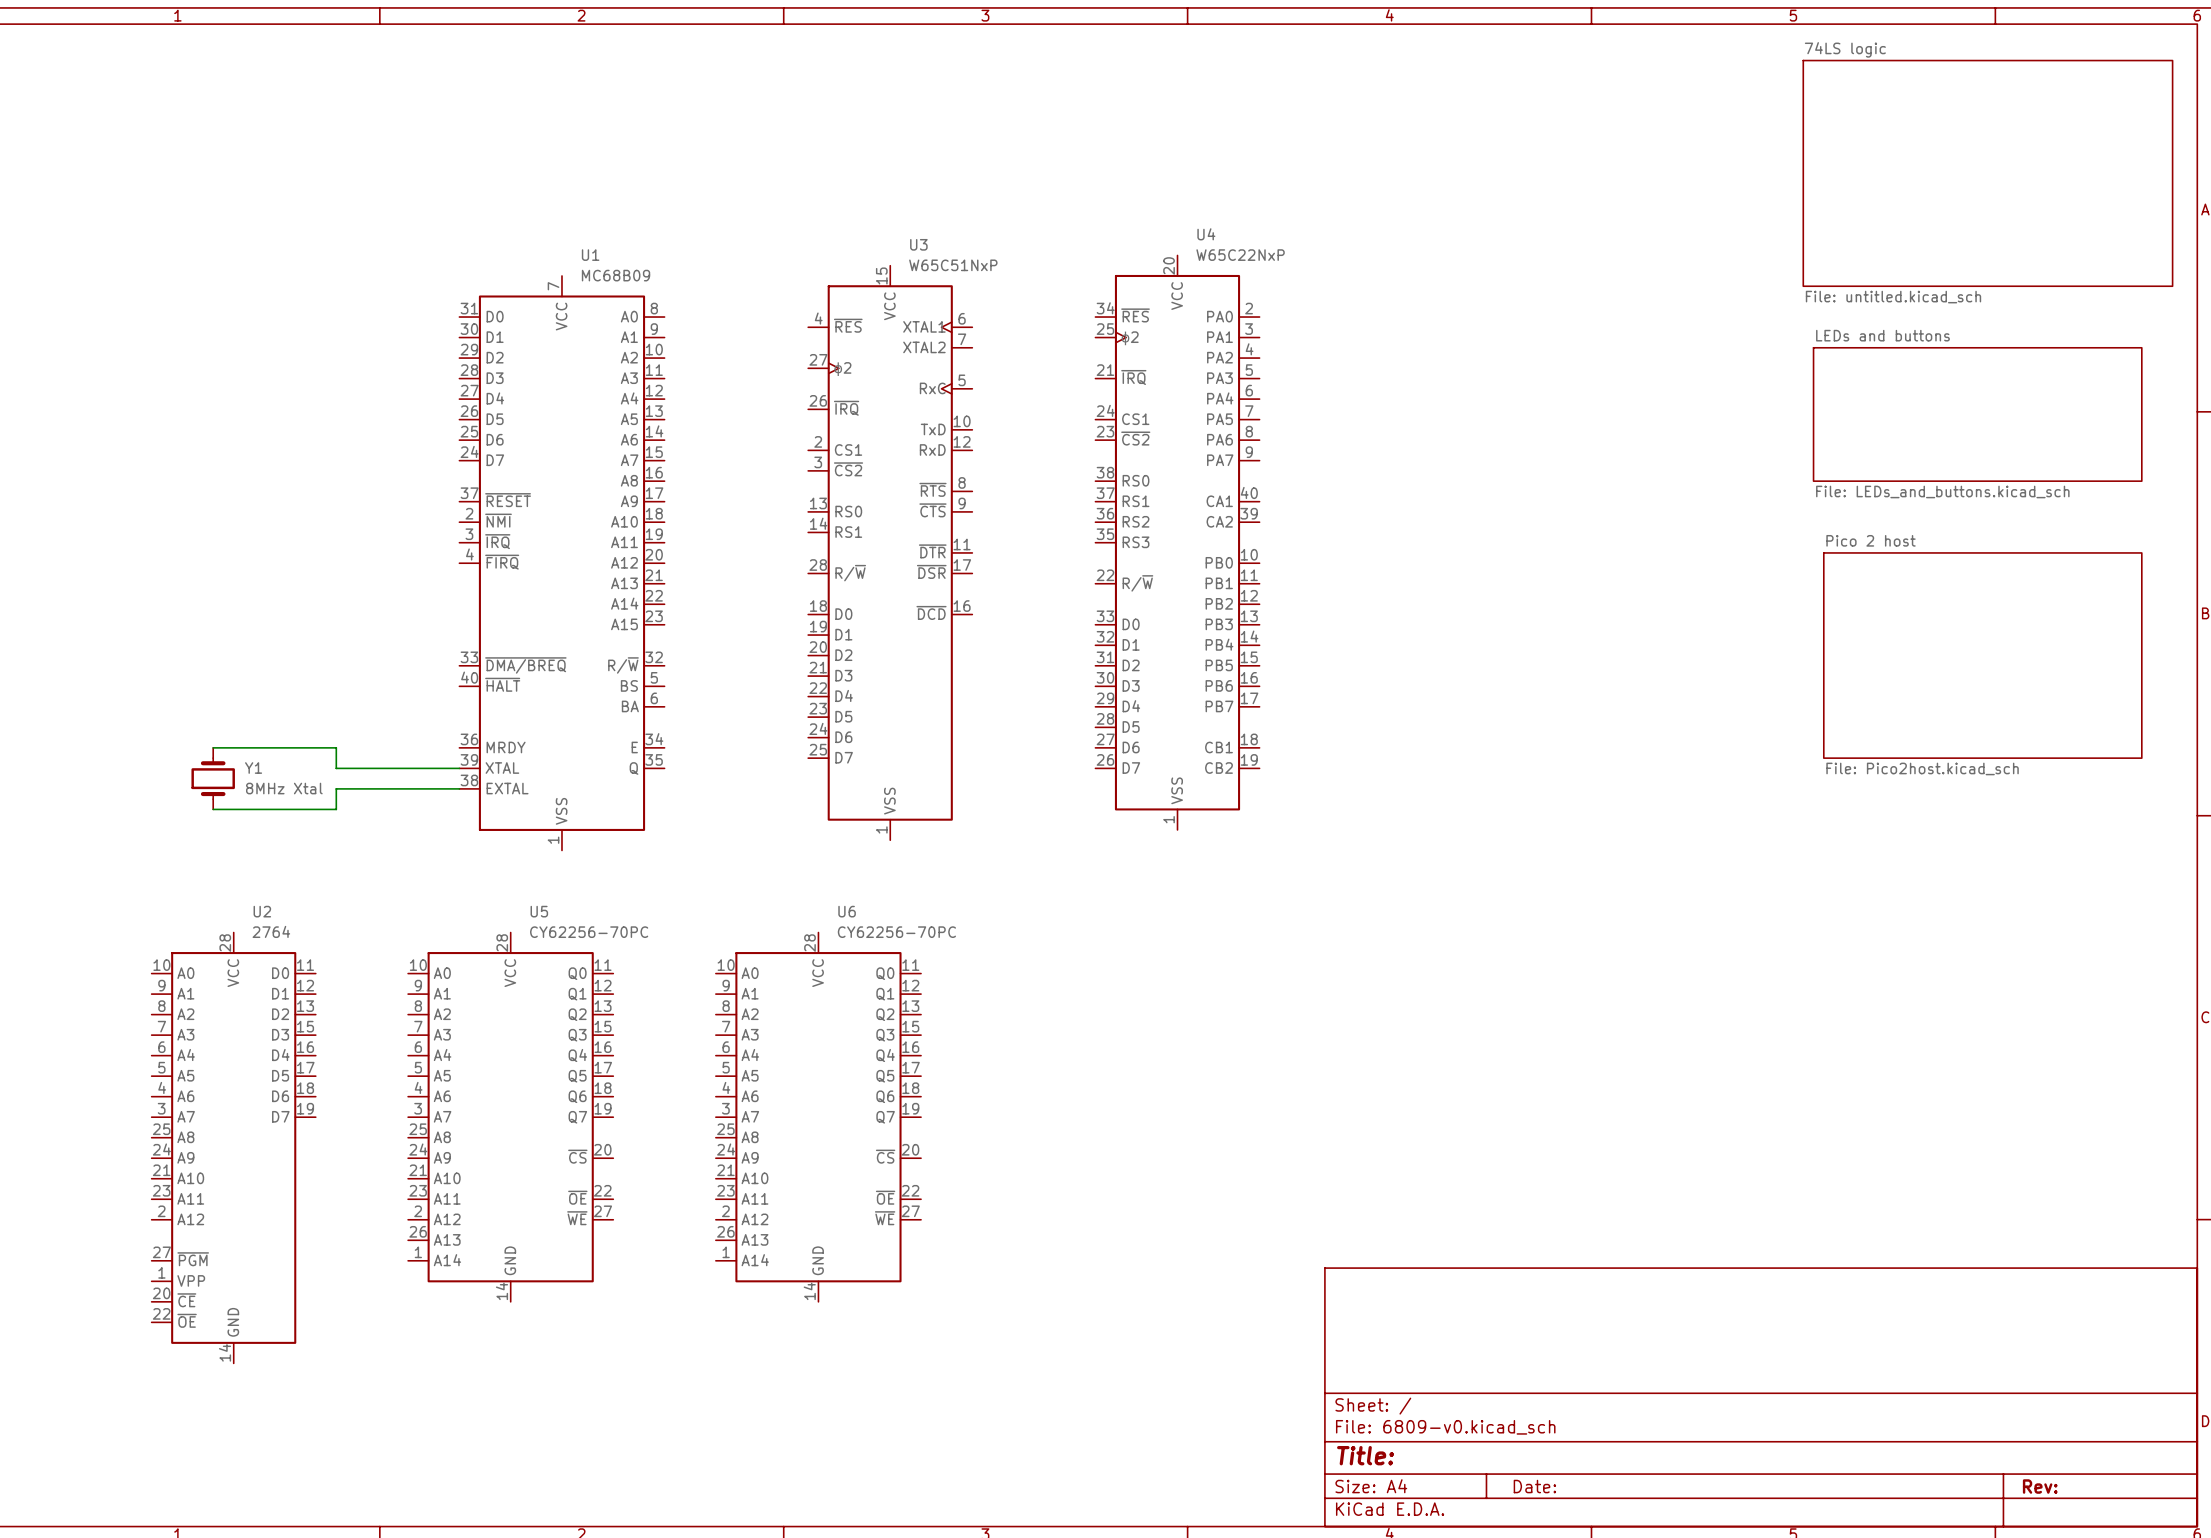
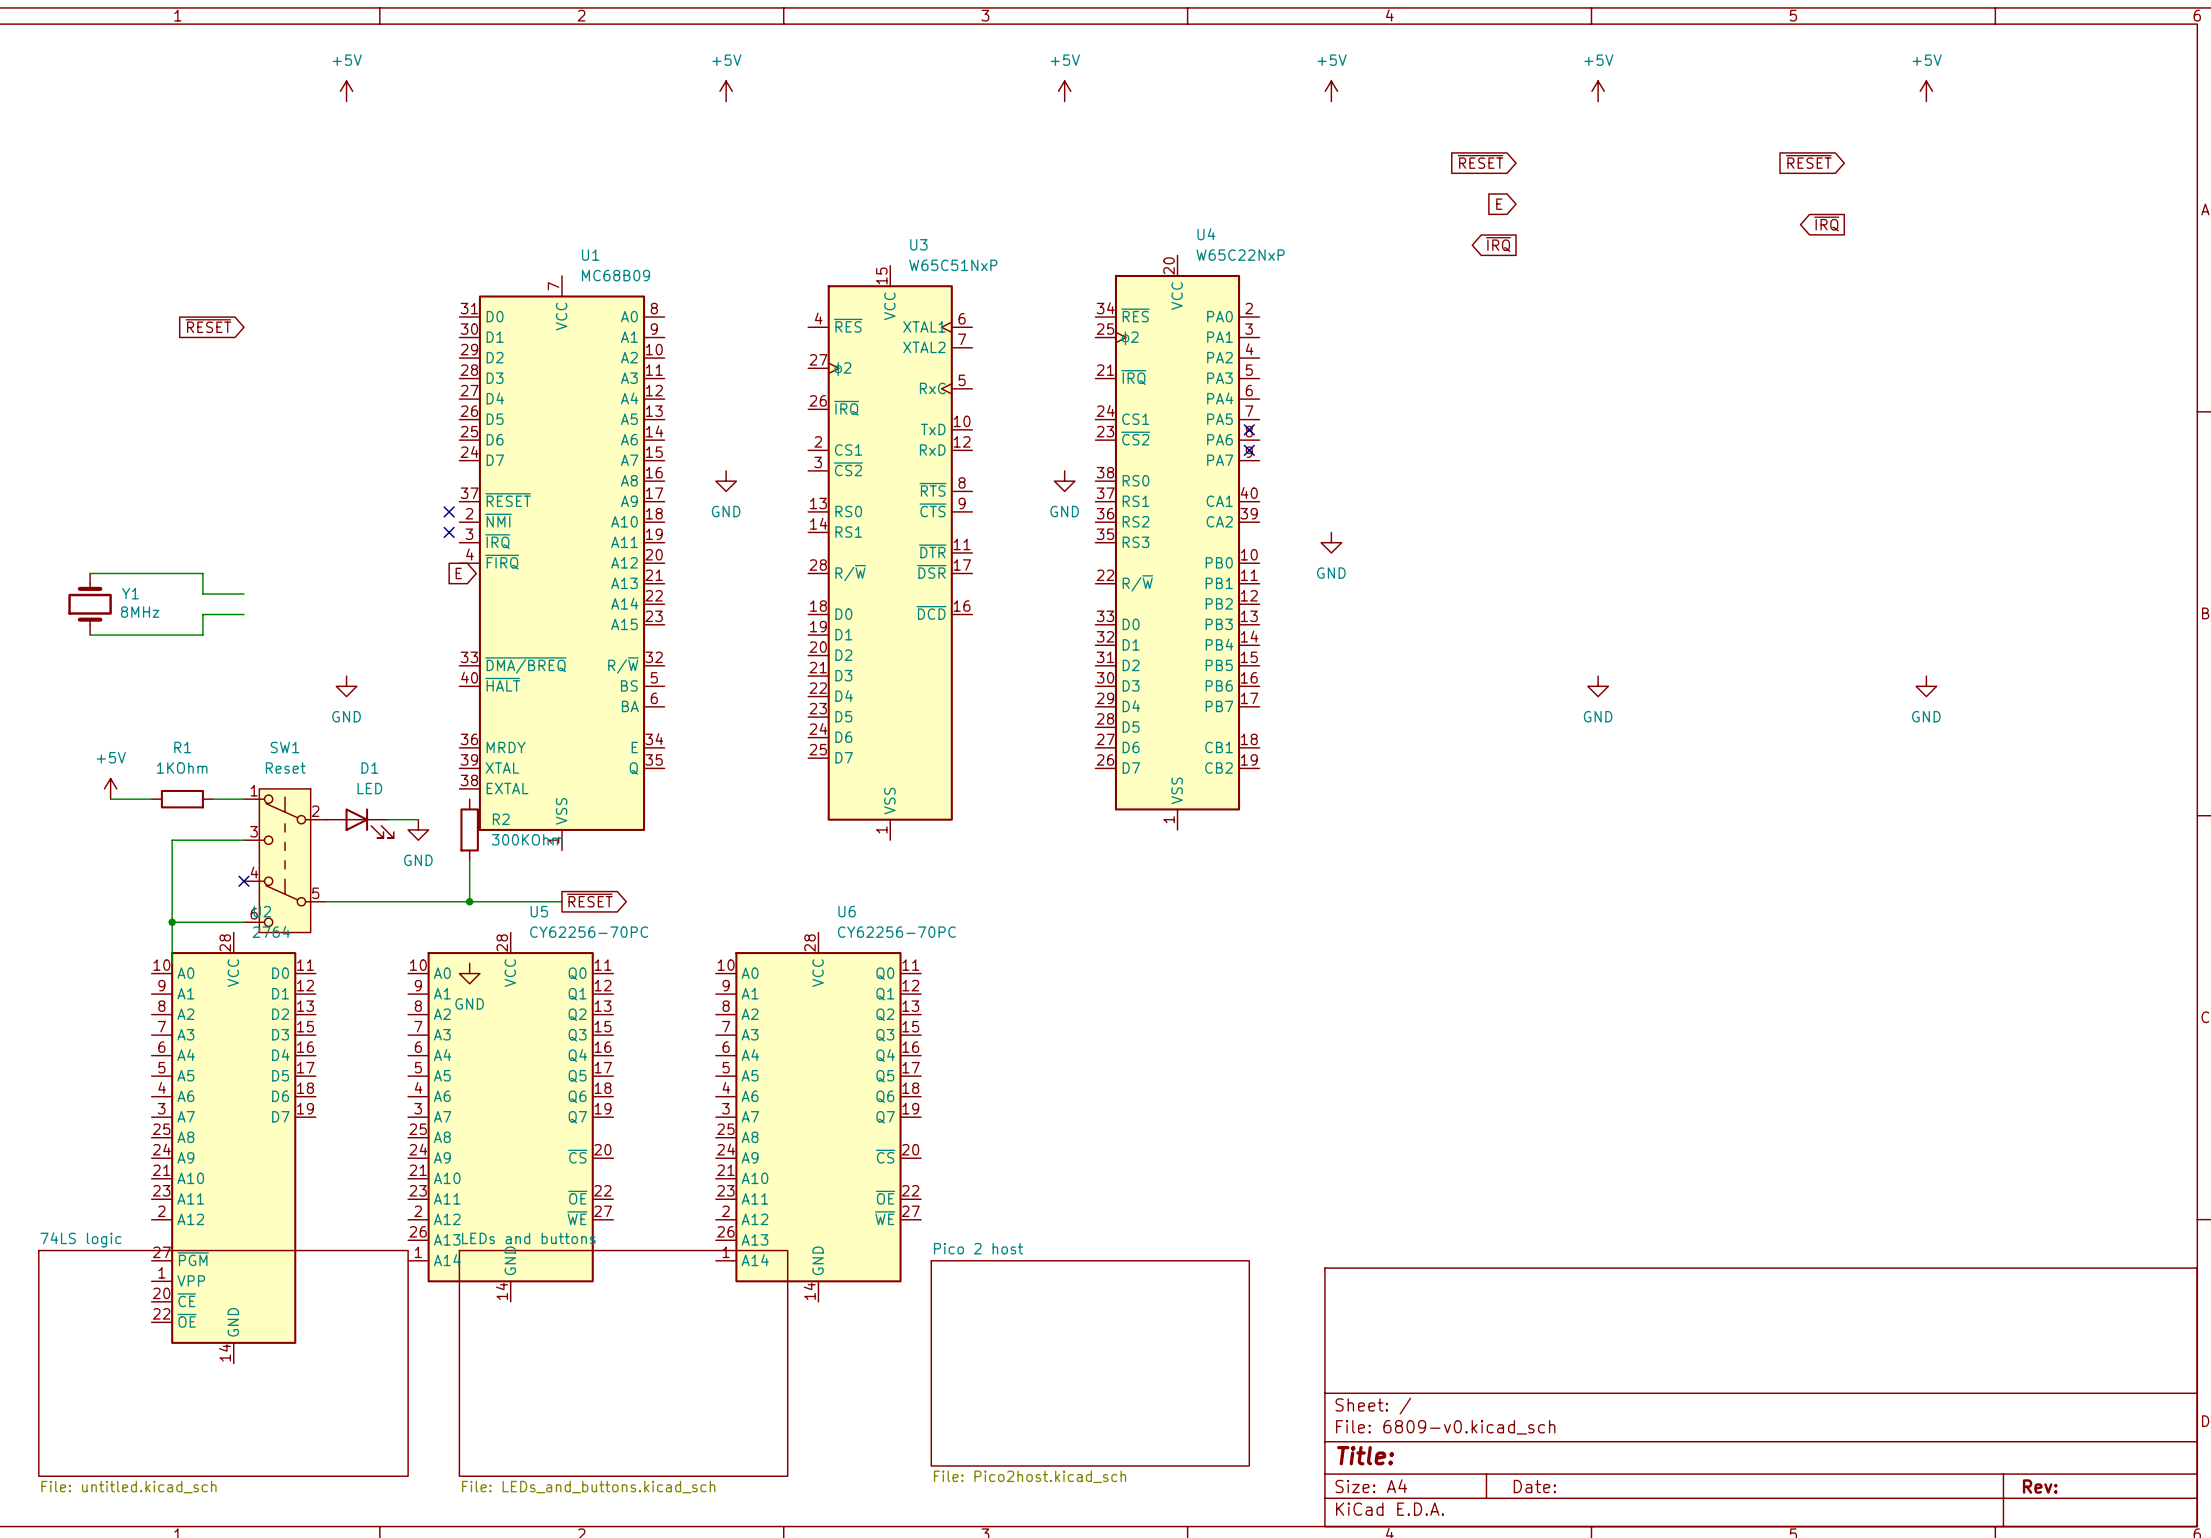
power symbol: none -> +5V (346, 91)
power symbol: none -> +5V (726, 91)
power symbol: none -> +5V (1064, 91)
power symbol: none -> +5V (1331, 91)
power symbol: none -> +5V (1598, 91)
power symbol: none -> +5V (1926, 91)
global label: none -> ~{RESET} (1480, 161)
global label: none -> ~{RESET} (1808, 161)
sheet 74LS logic position: (1987, 173) -> (223, 1363)
global label: none -> E (1499, 204)
global label: none -> ~{IRQ} (1826, 223)
global label: none -> ~{IRQ} (1498, 244)
global label: none -> ~{RESET} (208, 326)
sheet LEDs and buttons: File: LEDs_and_buttons.kicad_sch (1977, 414) -> none
no-connect mark: none -> (1249, 429)
no-connect mark: none -> (1249, 450)
power symbol: none -> GND (726, 481)
power symbol: none -> GND (1064, 481)
no-connect mark: none -> (449, 511)
no-connect mark: none -> (449, 532)
power symbol: none -> GND (1331, 542)
wire: none -> (90, 573) (202, 573) (202, 594) (243, 594)
global label: none -> E (458, 573)
wire: none -> (243, 614) (202, 614) (202, 635) (90, 635)
sheet Pico 2 host position: (1982, 655) -> (1090, 1363)
power symbol: none -> GND (346, 686)
power symbol: none -> GND (1598, 686)
power symbol: none -> GND (1926, 686)
wire: (213, 747) (336, 747) (336, 768) (459, 768) -> none
Y1 position: (213, 778) -> (90, 604)
power symbol: none -> +5V (110, 788)
Y1 value: 8MHz Xtal (284, 788) -> 8MHz (140, 612)
wire: (459, 788) (336, 788) (336, 809) (213, 809) -> none
wire: none -> (110, 799) (151, 799)
R1: none -> 1KOhm (182, 799)
wire: none -> (213, 799) (243, 799)
wire: none -> (387, 819) (418, 819)
D1: none -> LED (359, 823)
power symbol: none -> GND (418, 829)
R2: none -> 300KOhm (469, 829)
wire: none -> (243, 840) (172, 840) (172, 963)
SW1: none -> Reset (285, 860)
wire: none -> (469, 860) (469, 901)
no-connect mark: none -> (243, 881)
global label: none -> ~{RESET} (589, 900)
wire: none -> (326, 901) (561, 901)
junction: none -> (469, 901)
wire: none -> (172, 922) (243, 922)
junction: none -> (172, 922)
power symbol: none -> GND (469, 973)
sheet LEDs and buttons: none -> File: LEDs_and_buttons.kicad_sch (623, 1363)

